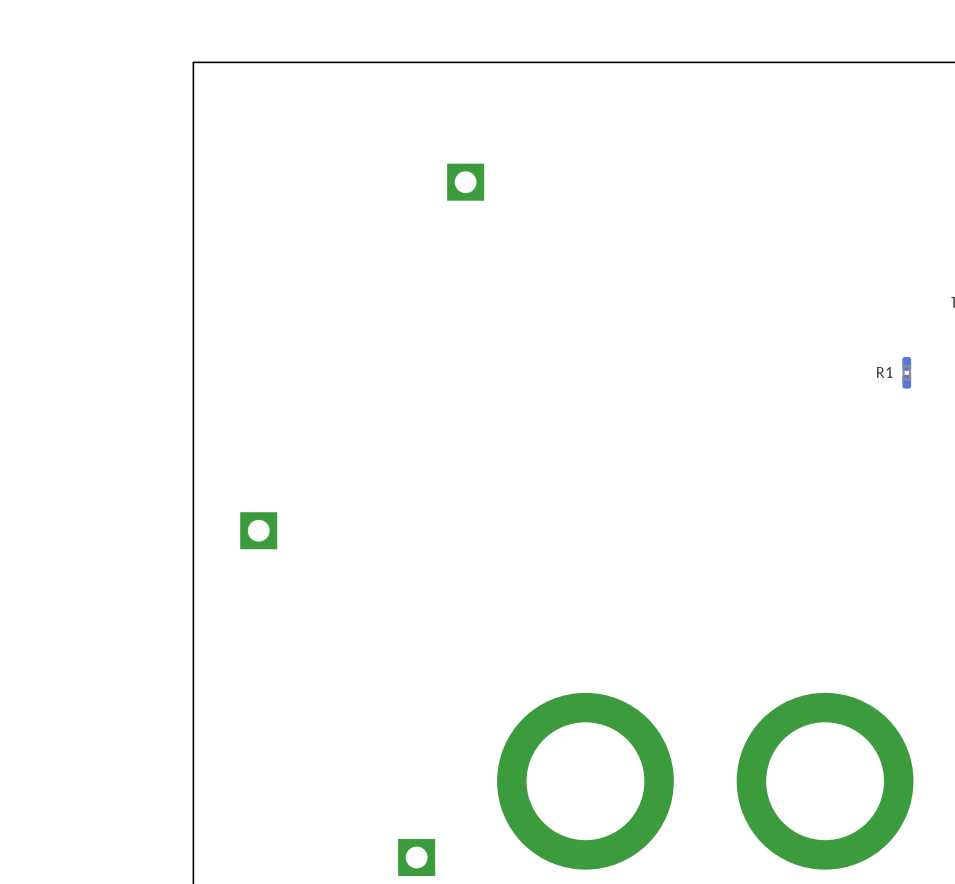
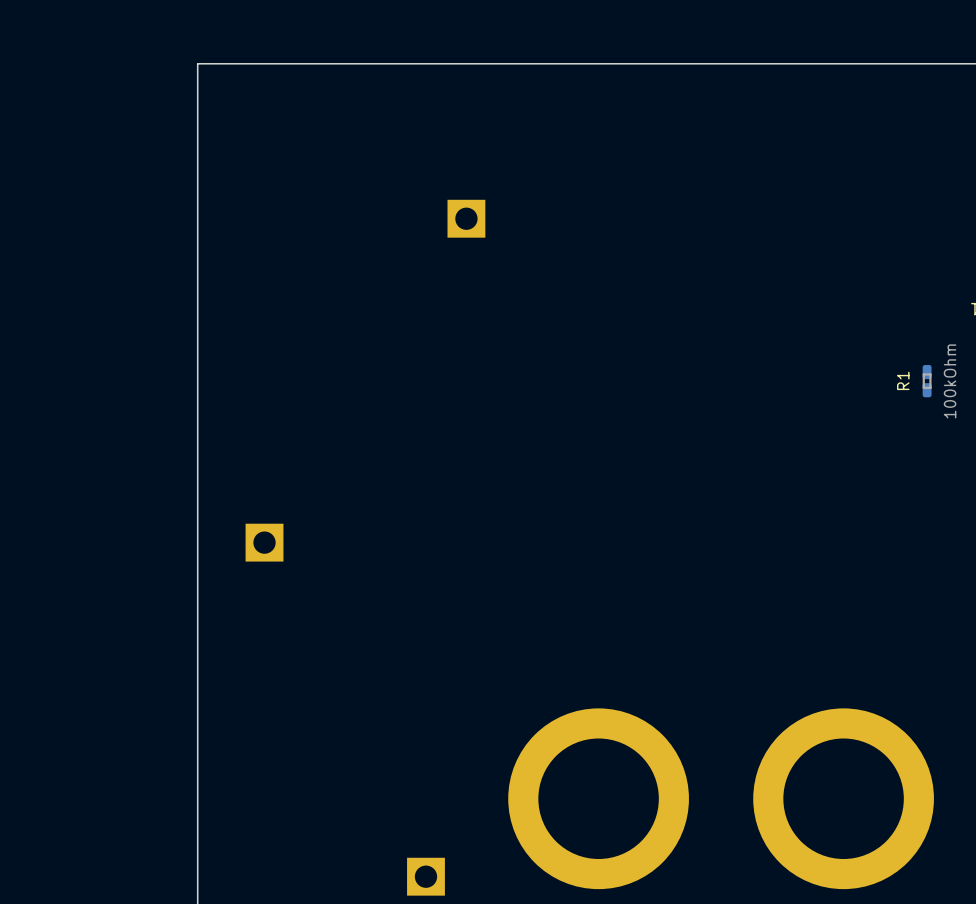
part position: (465, 182) -> (466, 218)
R1 name rotation: 0° (884, 372) -> 90° counterclockwise (903, 380)
R1 value: none -> 100kOhm (950, 381)

